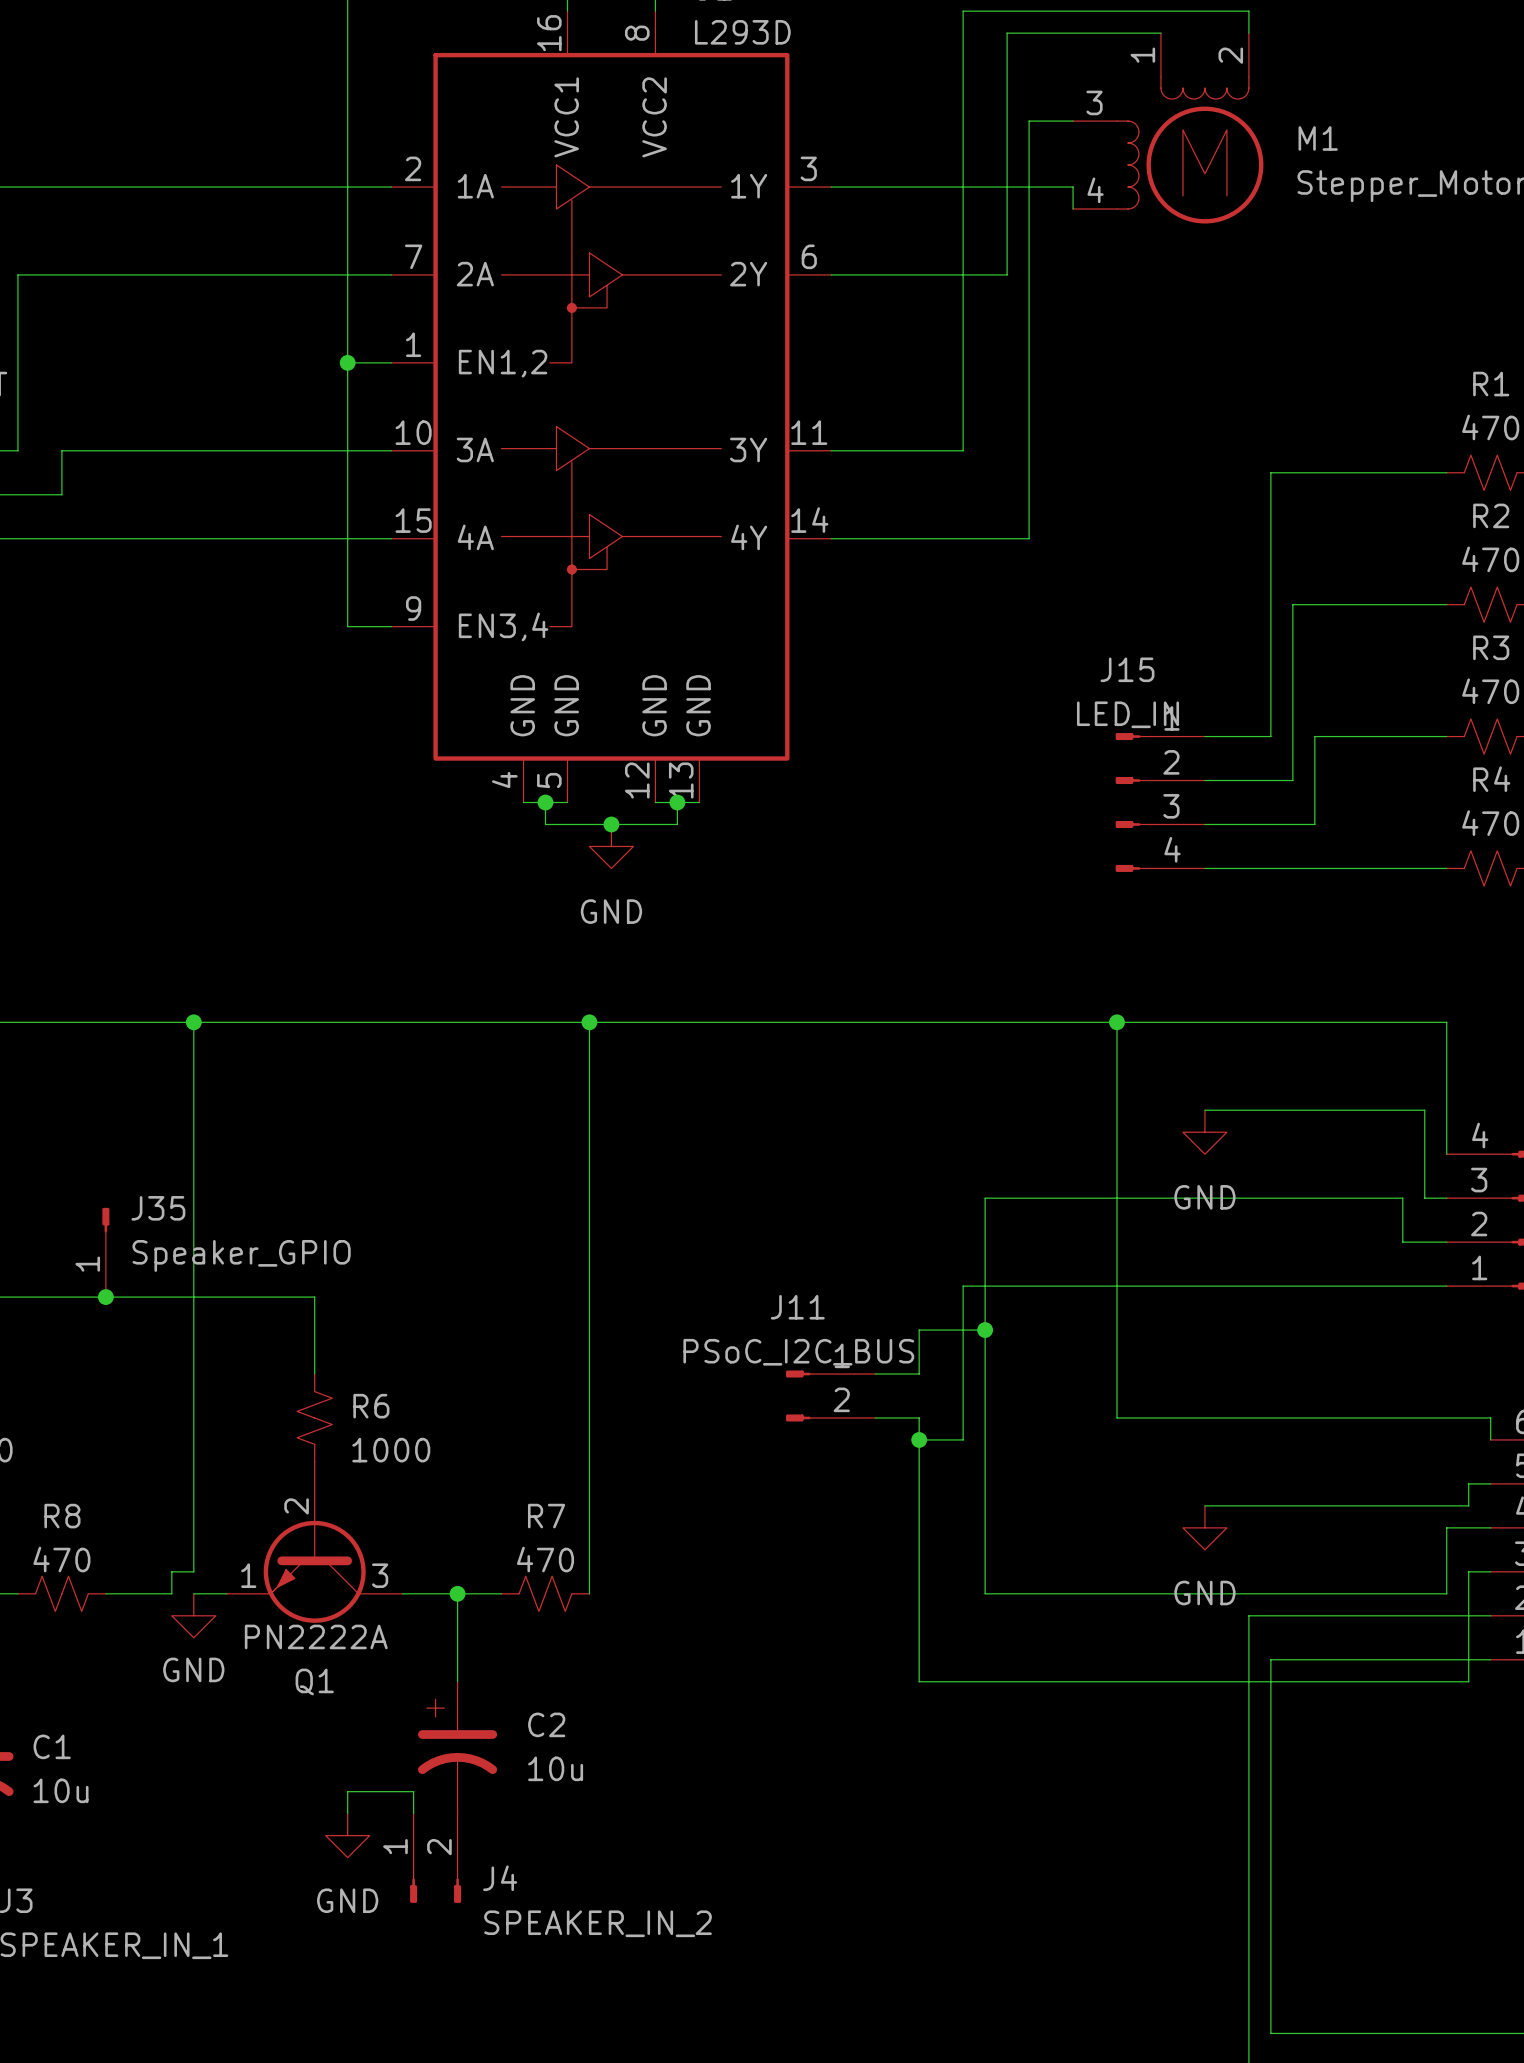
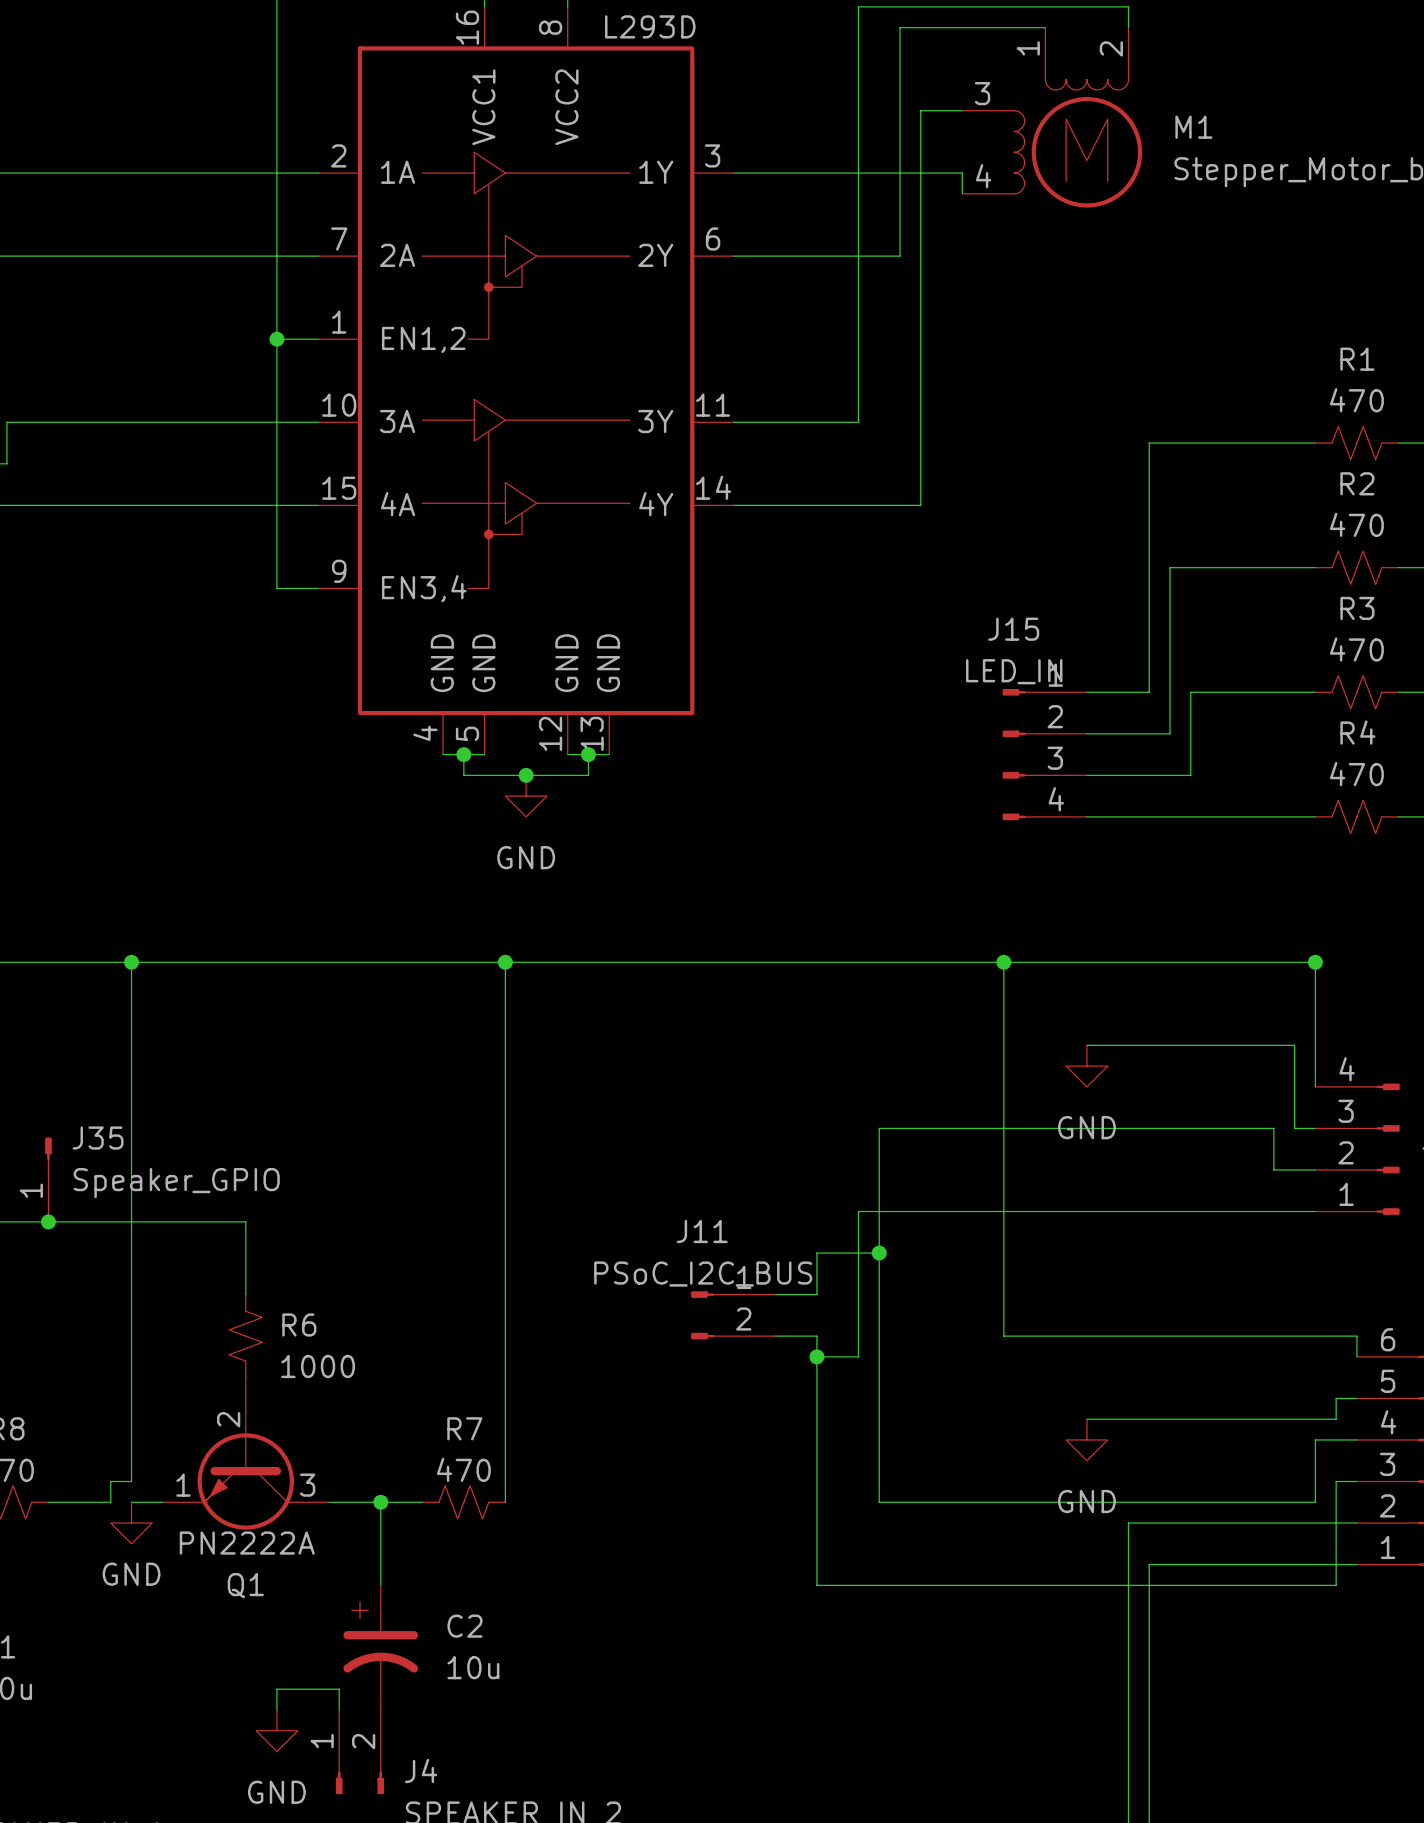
junction: none -> (1315, 962)

